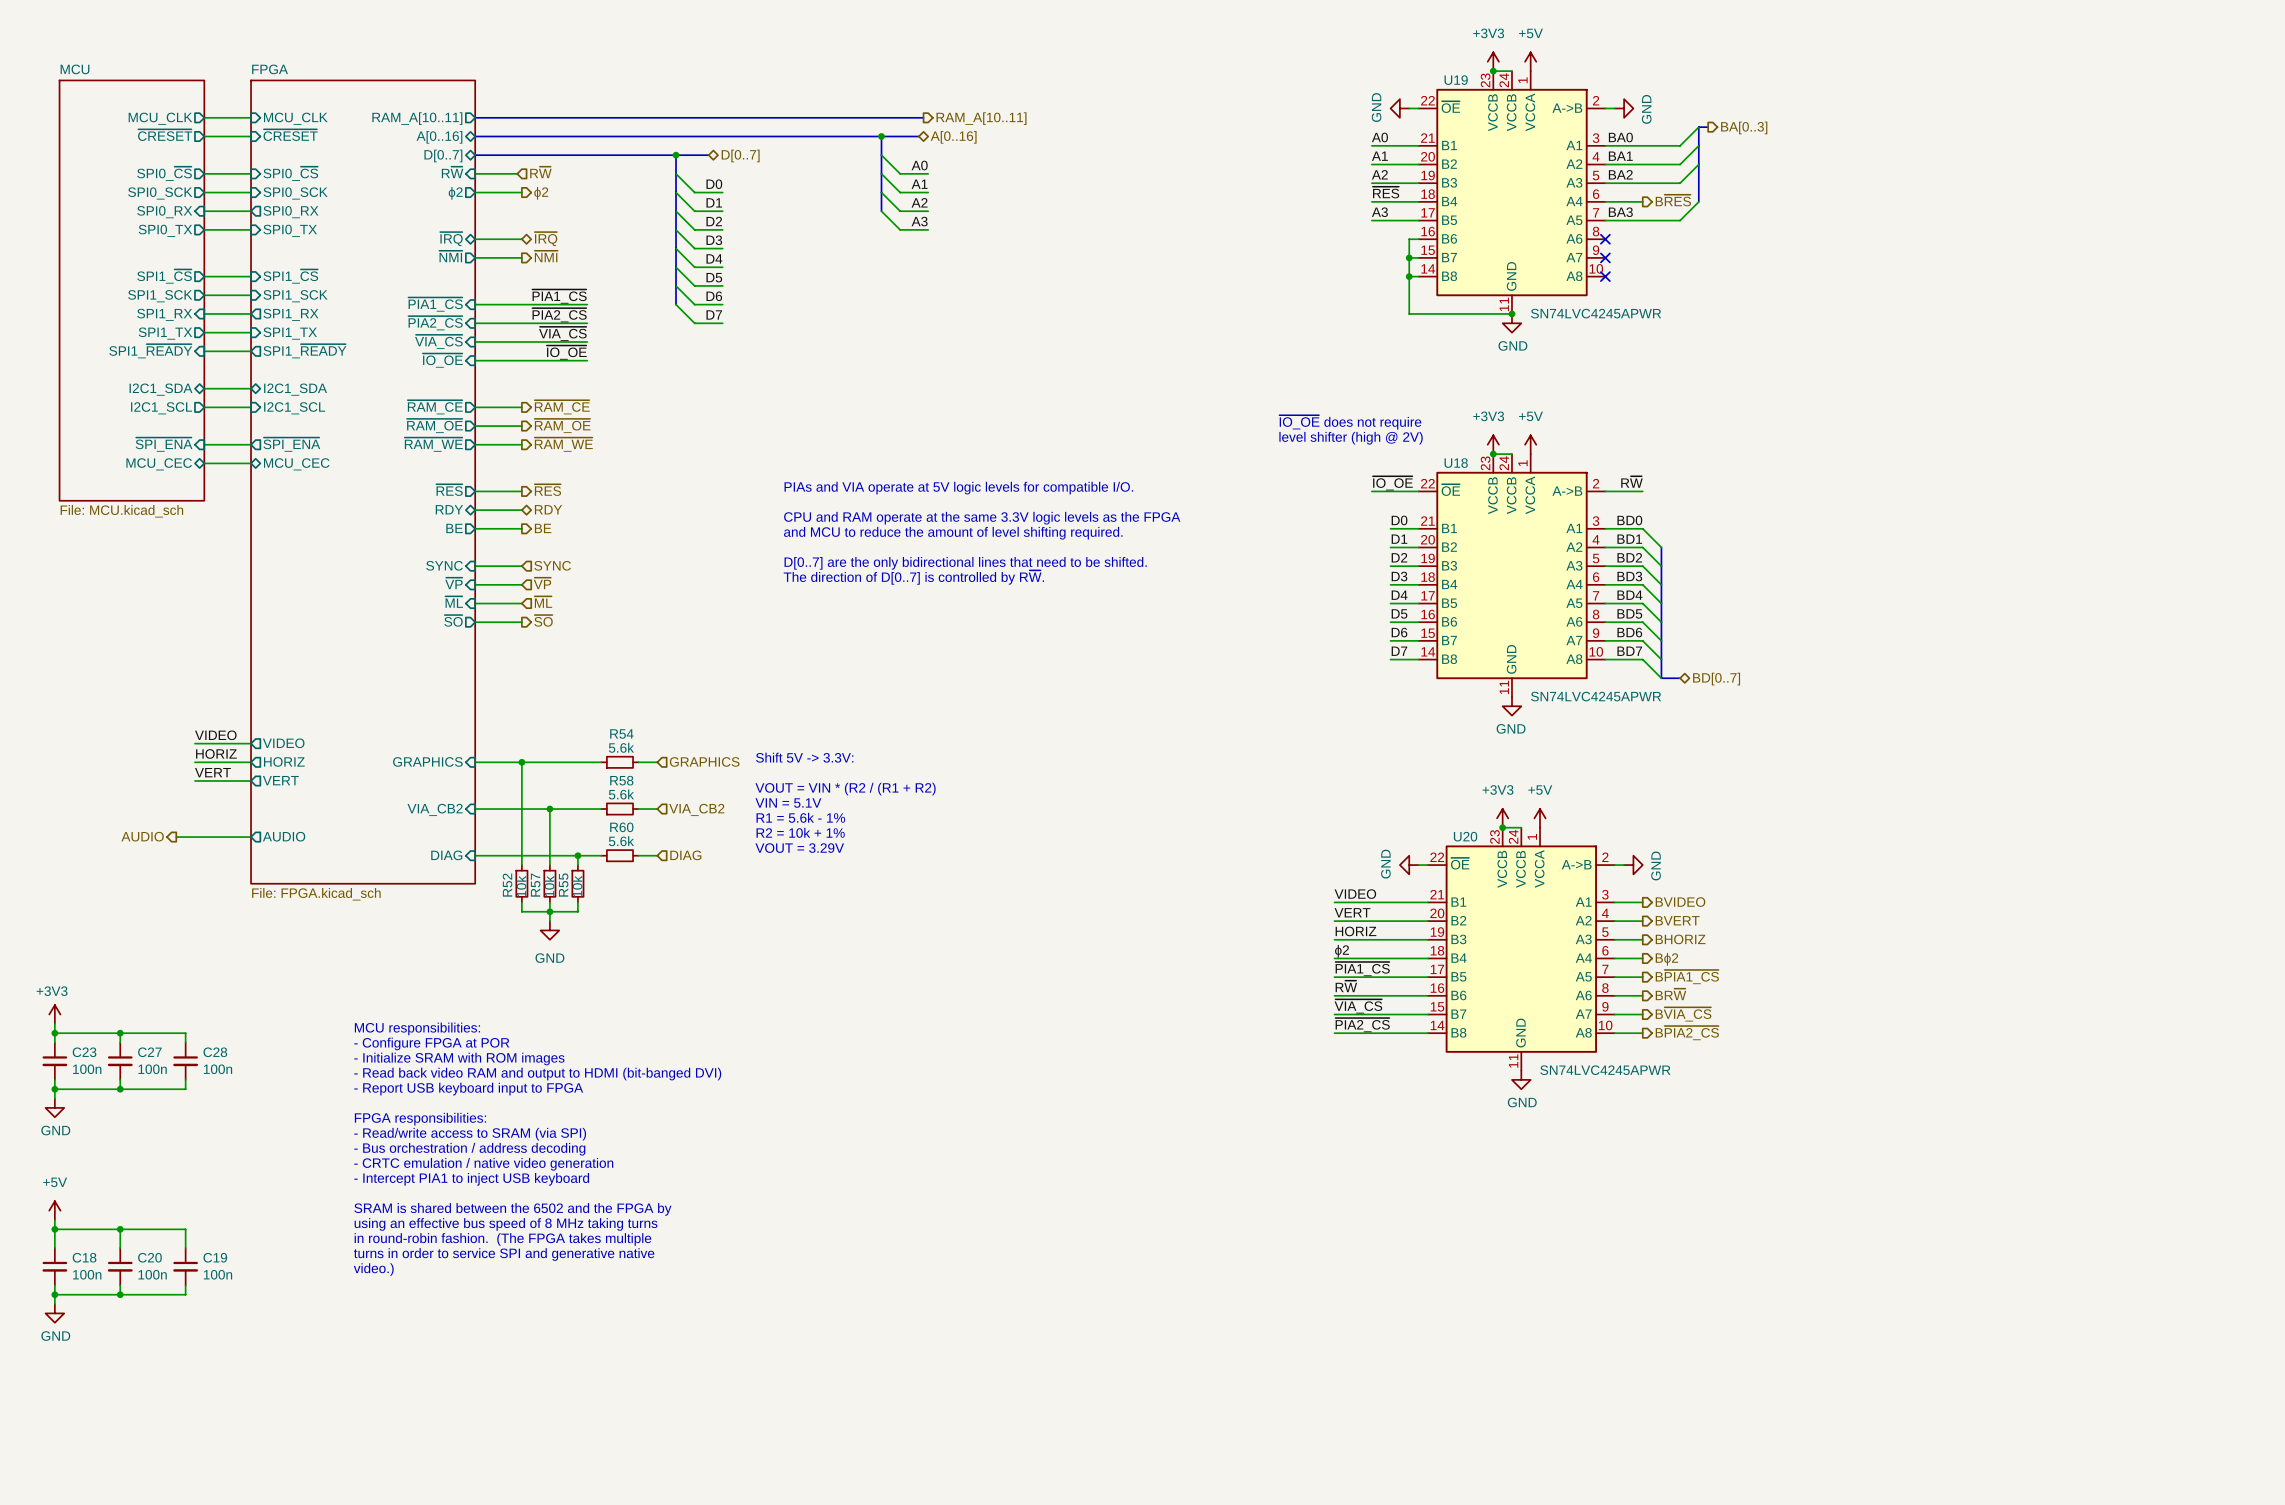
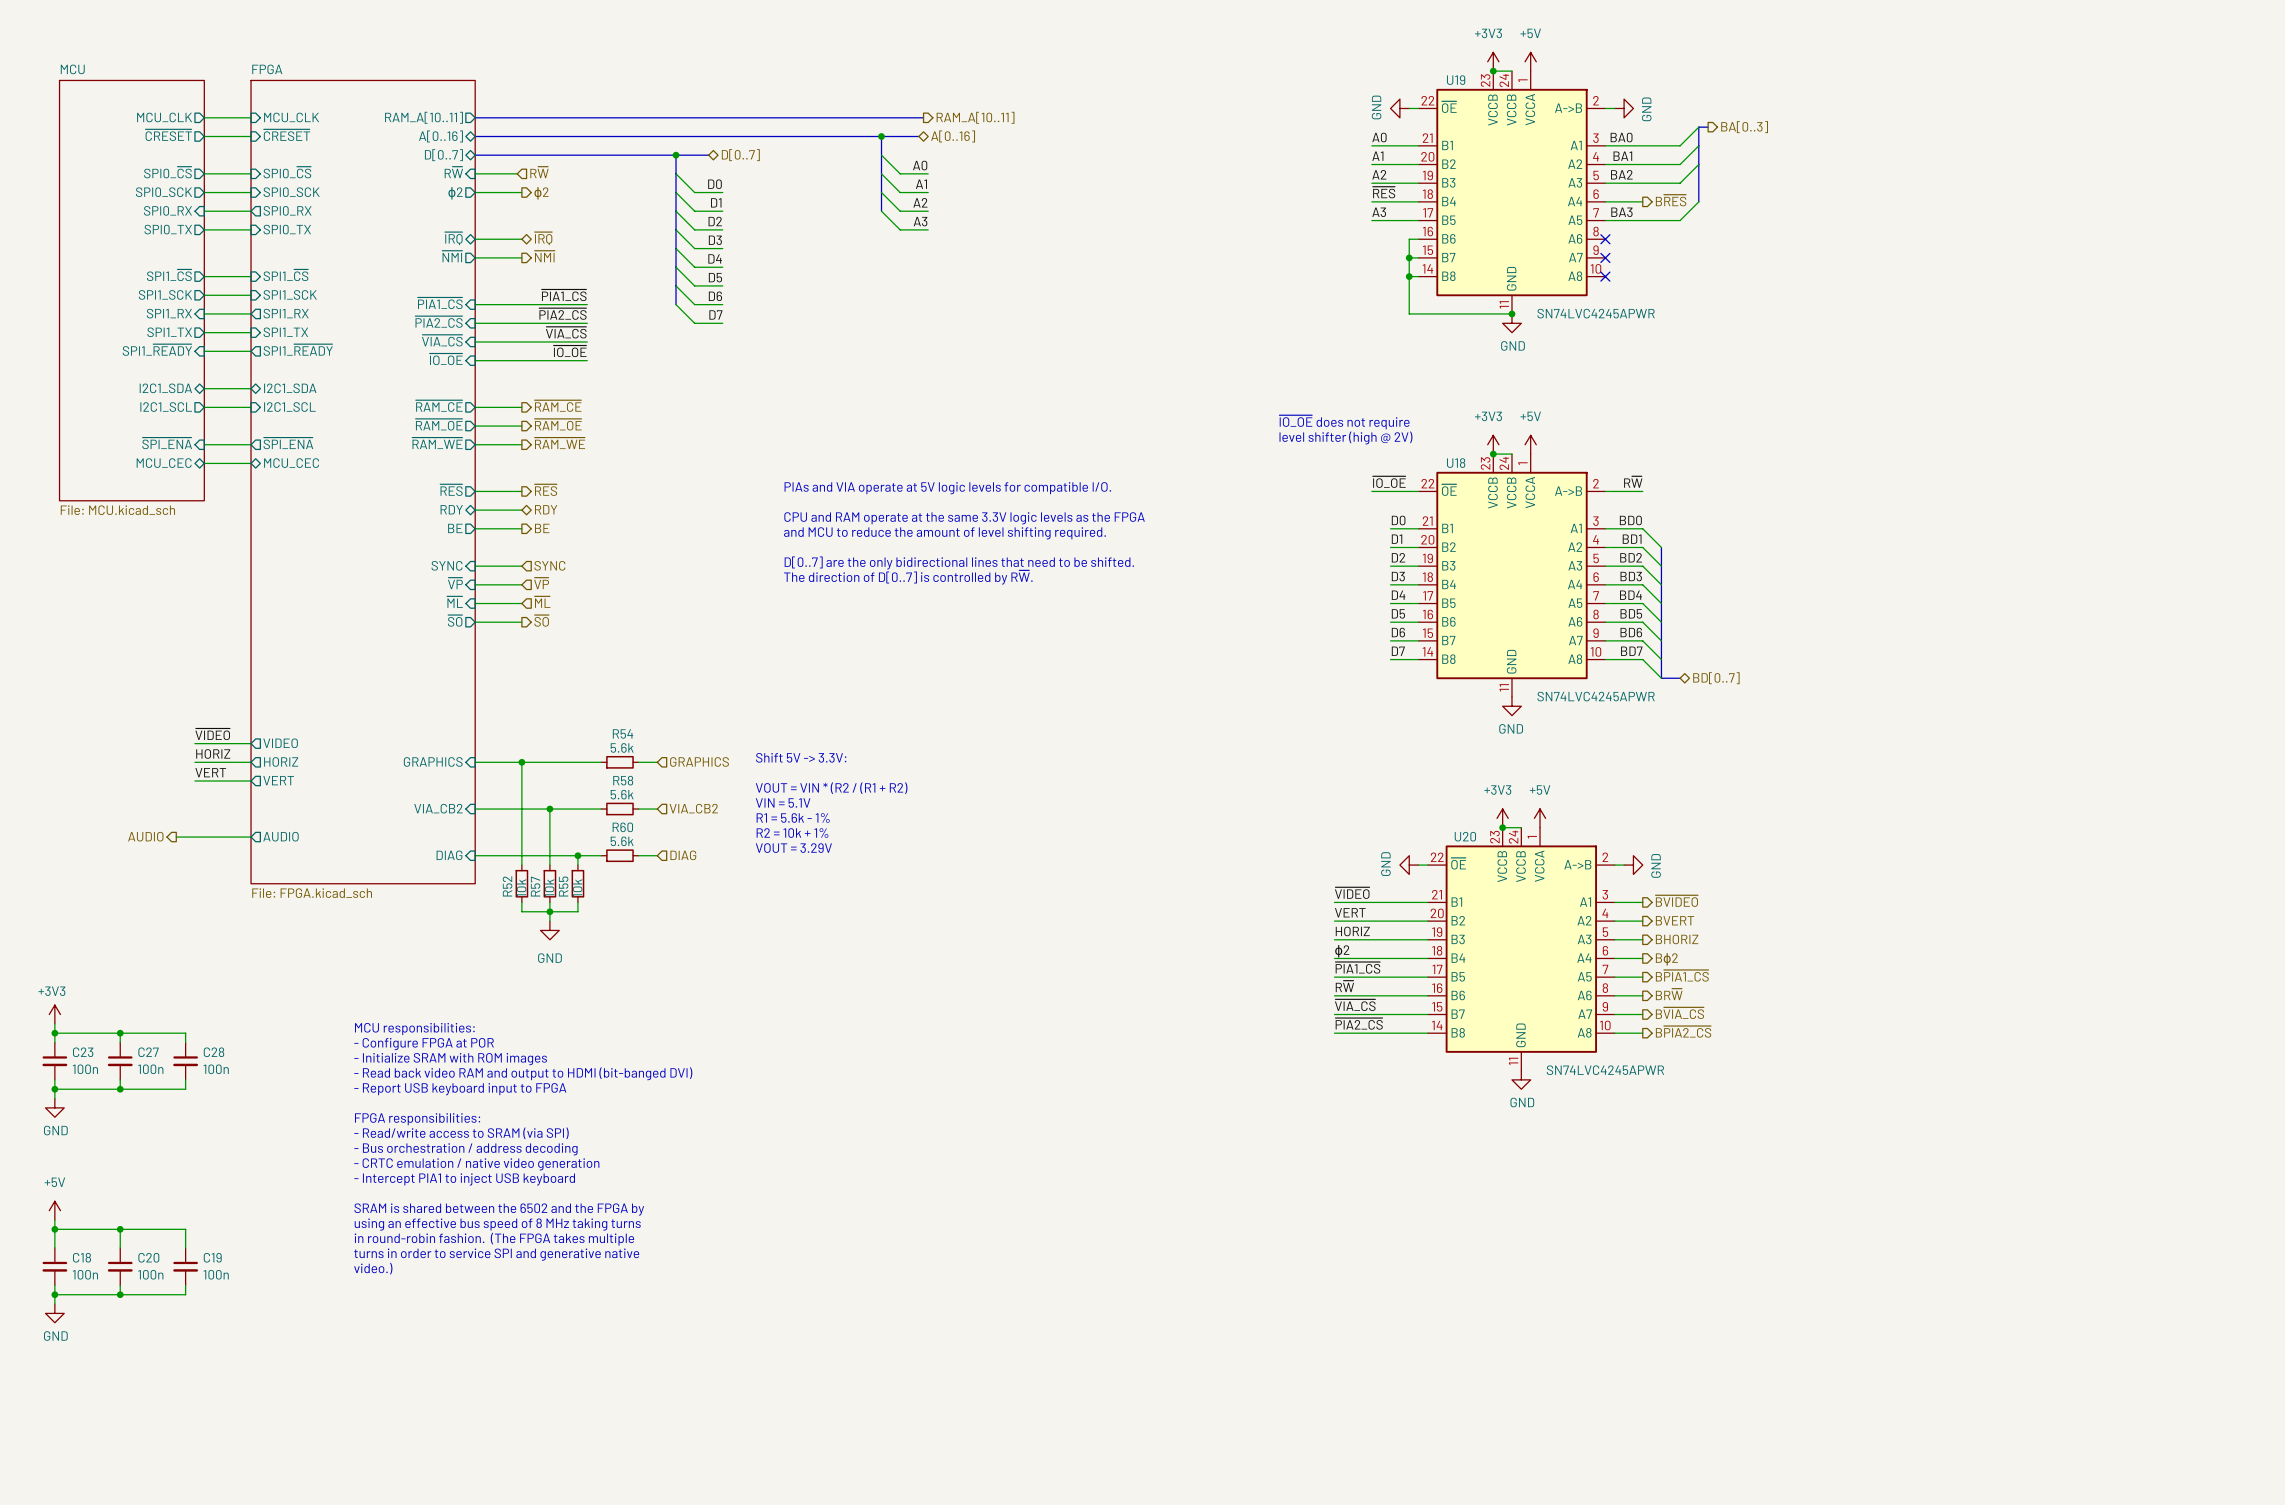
label: VIDEO (215, 735) -> ~{VIDEO} (212, 734)
label: VIDEO (1355, 894) -> ~{VIDEO} (1352, 893)
hierarchical label: BVIDEO (1680, 902) -> ~{BVIDEO} (1676, 901)

